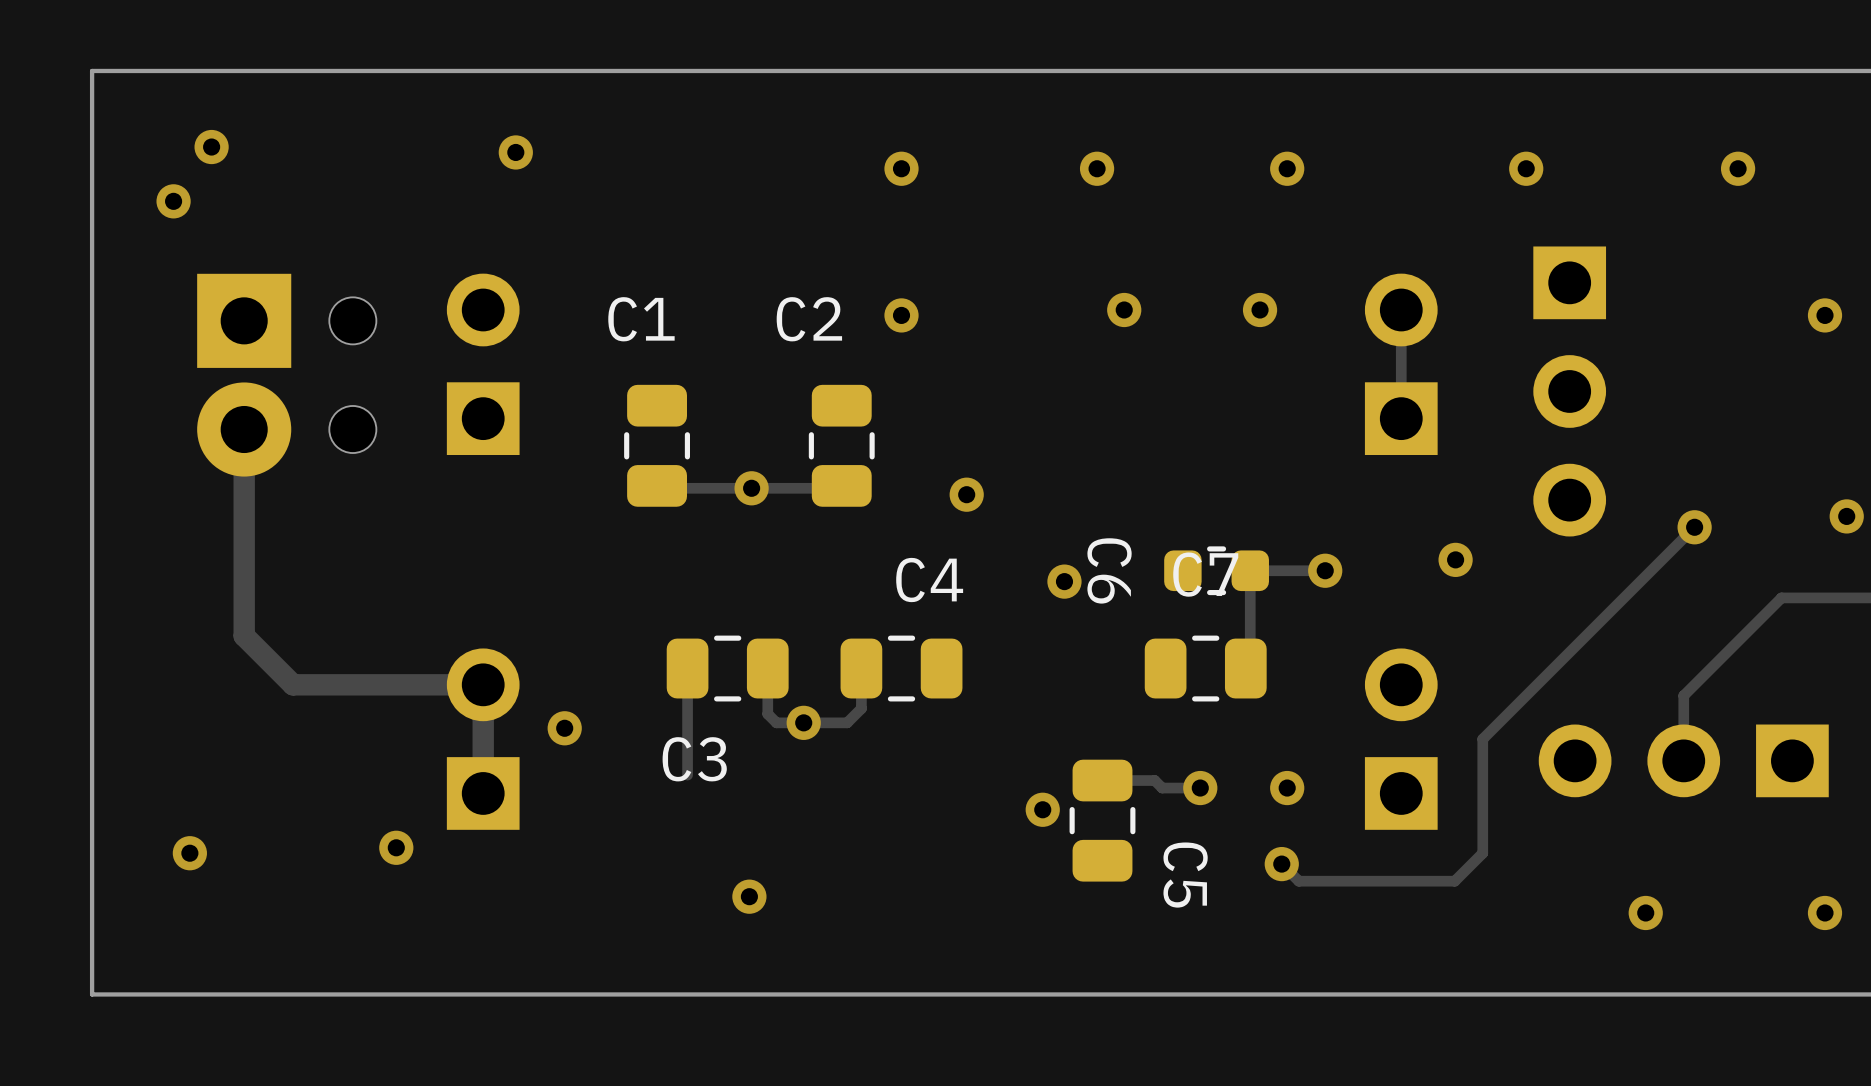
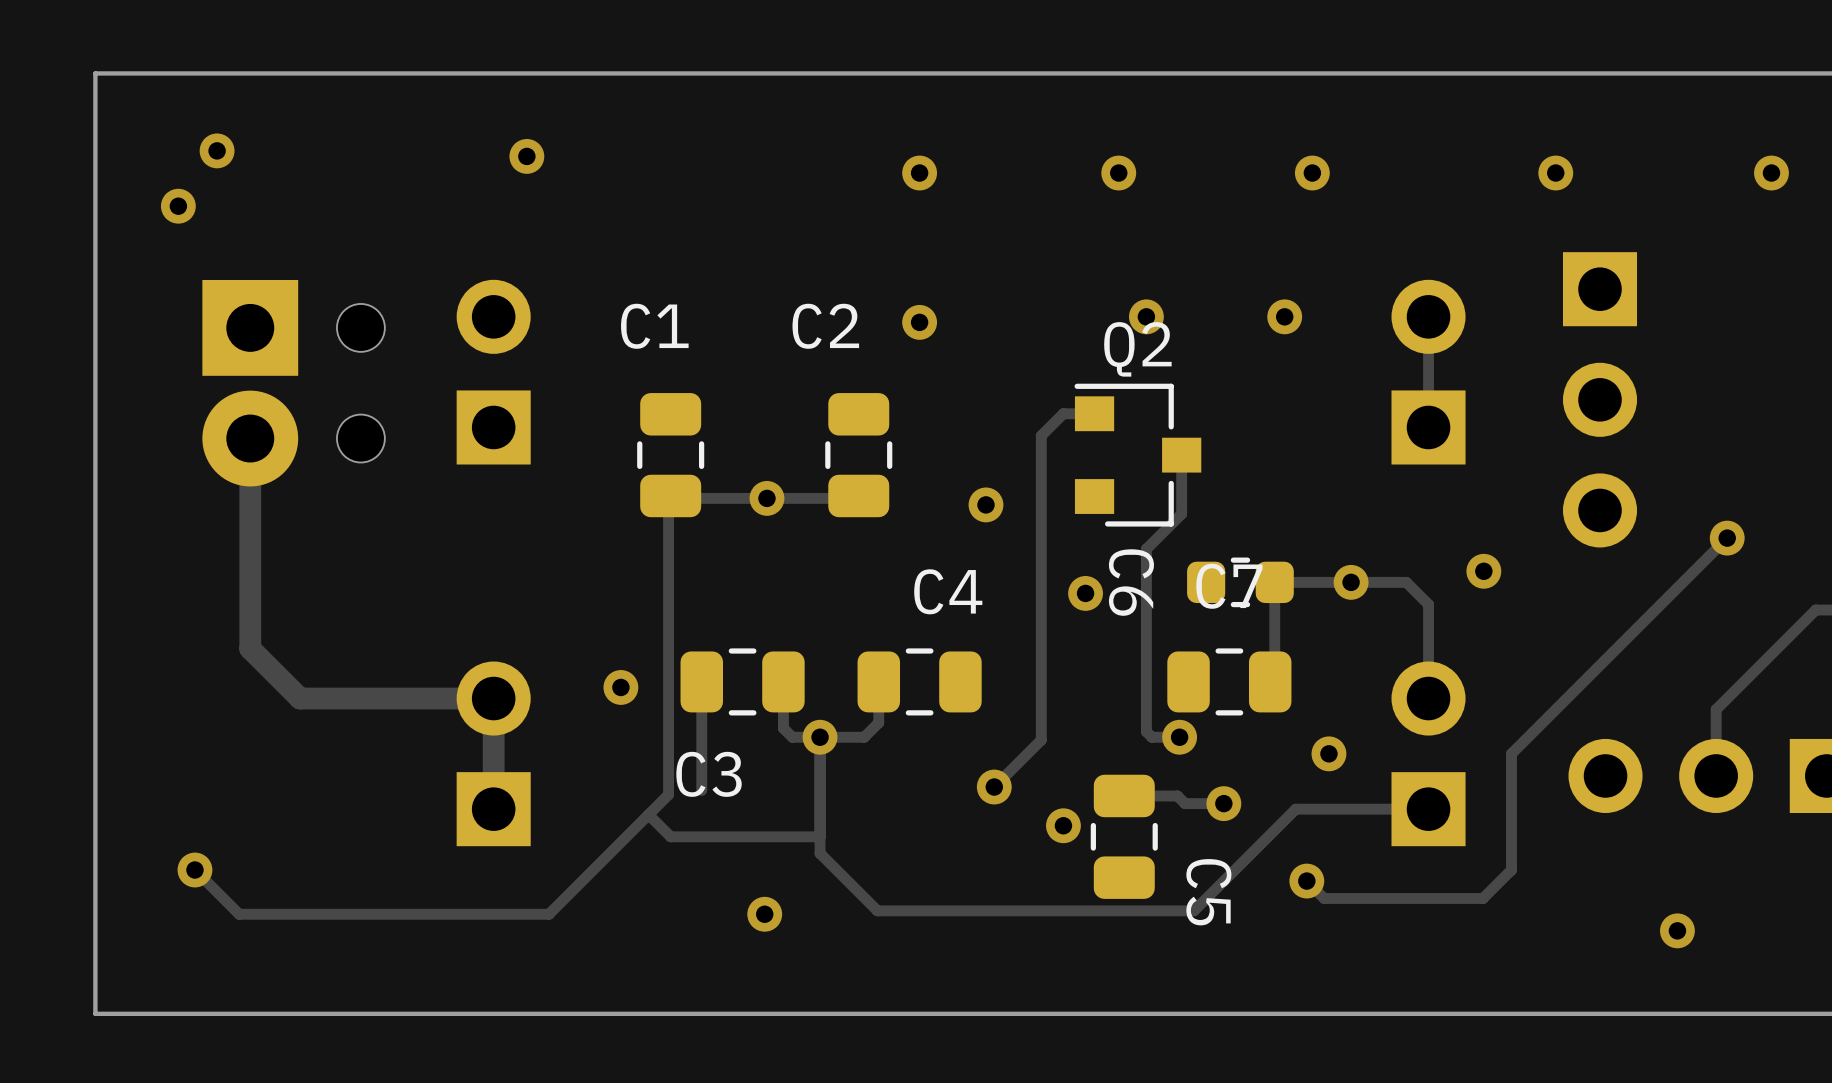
track: none -> (1094, 413) (1063, 413) (1041, 435) (1041, 740) (994, 787)
Q2: none -> (1137, 455)
track: none -> (1181, 455) (1181, 513) (1146, 549) (1146, 731) (1151, 737) (1179, 737)
track: none -> (670, 495) (668, 498) (668, 794) (548, 914) (239, 914) (194, 870)
track: none -> (1351, 582) (1406, 582) (1428, 604) (1428, 698)
track: none -> (820, 737) (820, 853) (877, 910) (1194, 910) (1295, 809) (1428, 809)
via: none -> (1179, 737)
via position: (564, 728) -> (620, 687)
via: none -> (994, 787)
via position: (1287, 788) -> (1328, 753)
track: none -> (648, 814) (670, 836) (820, 836)
via: (396, 847) -> none

